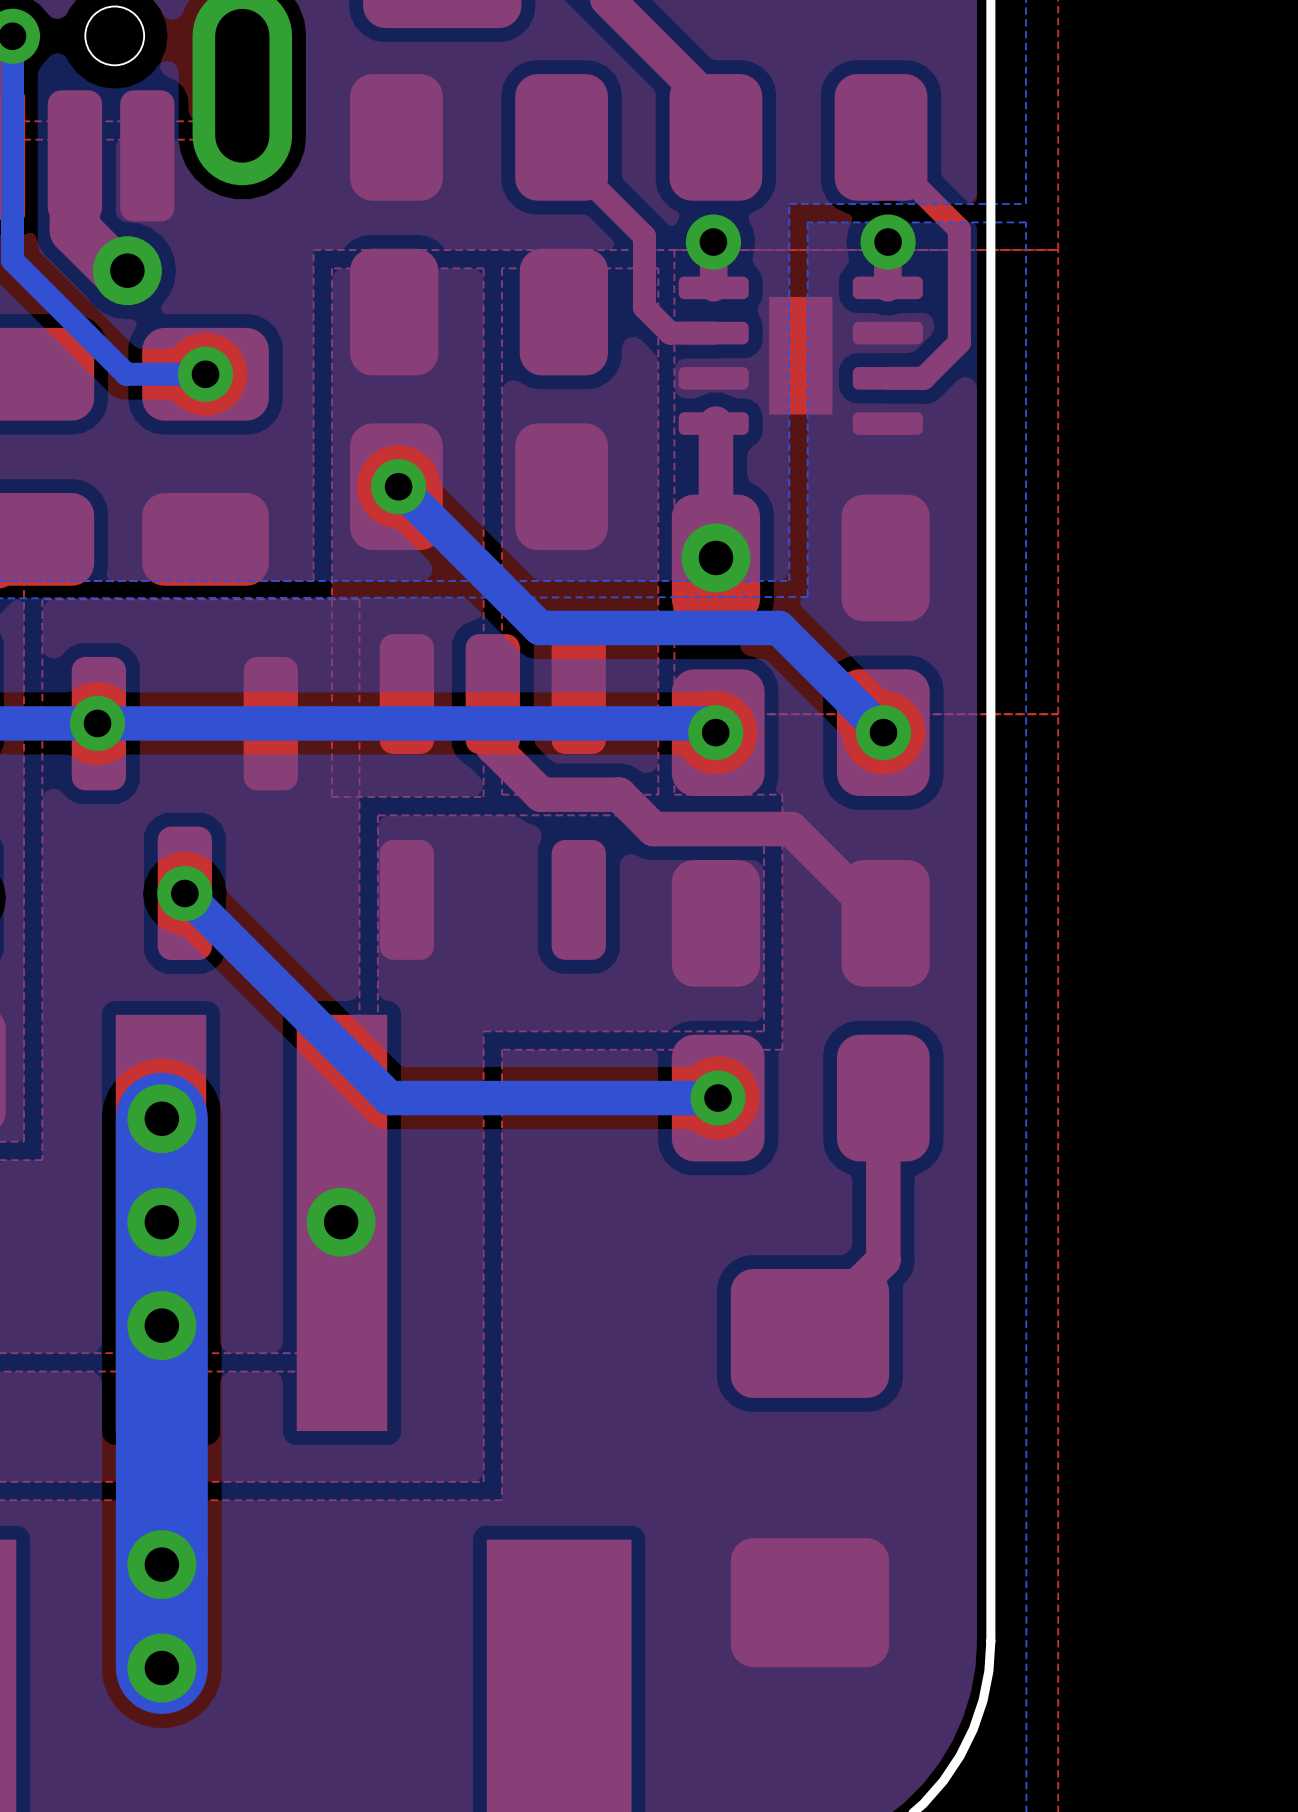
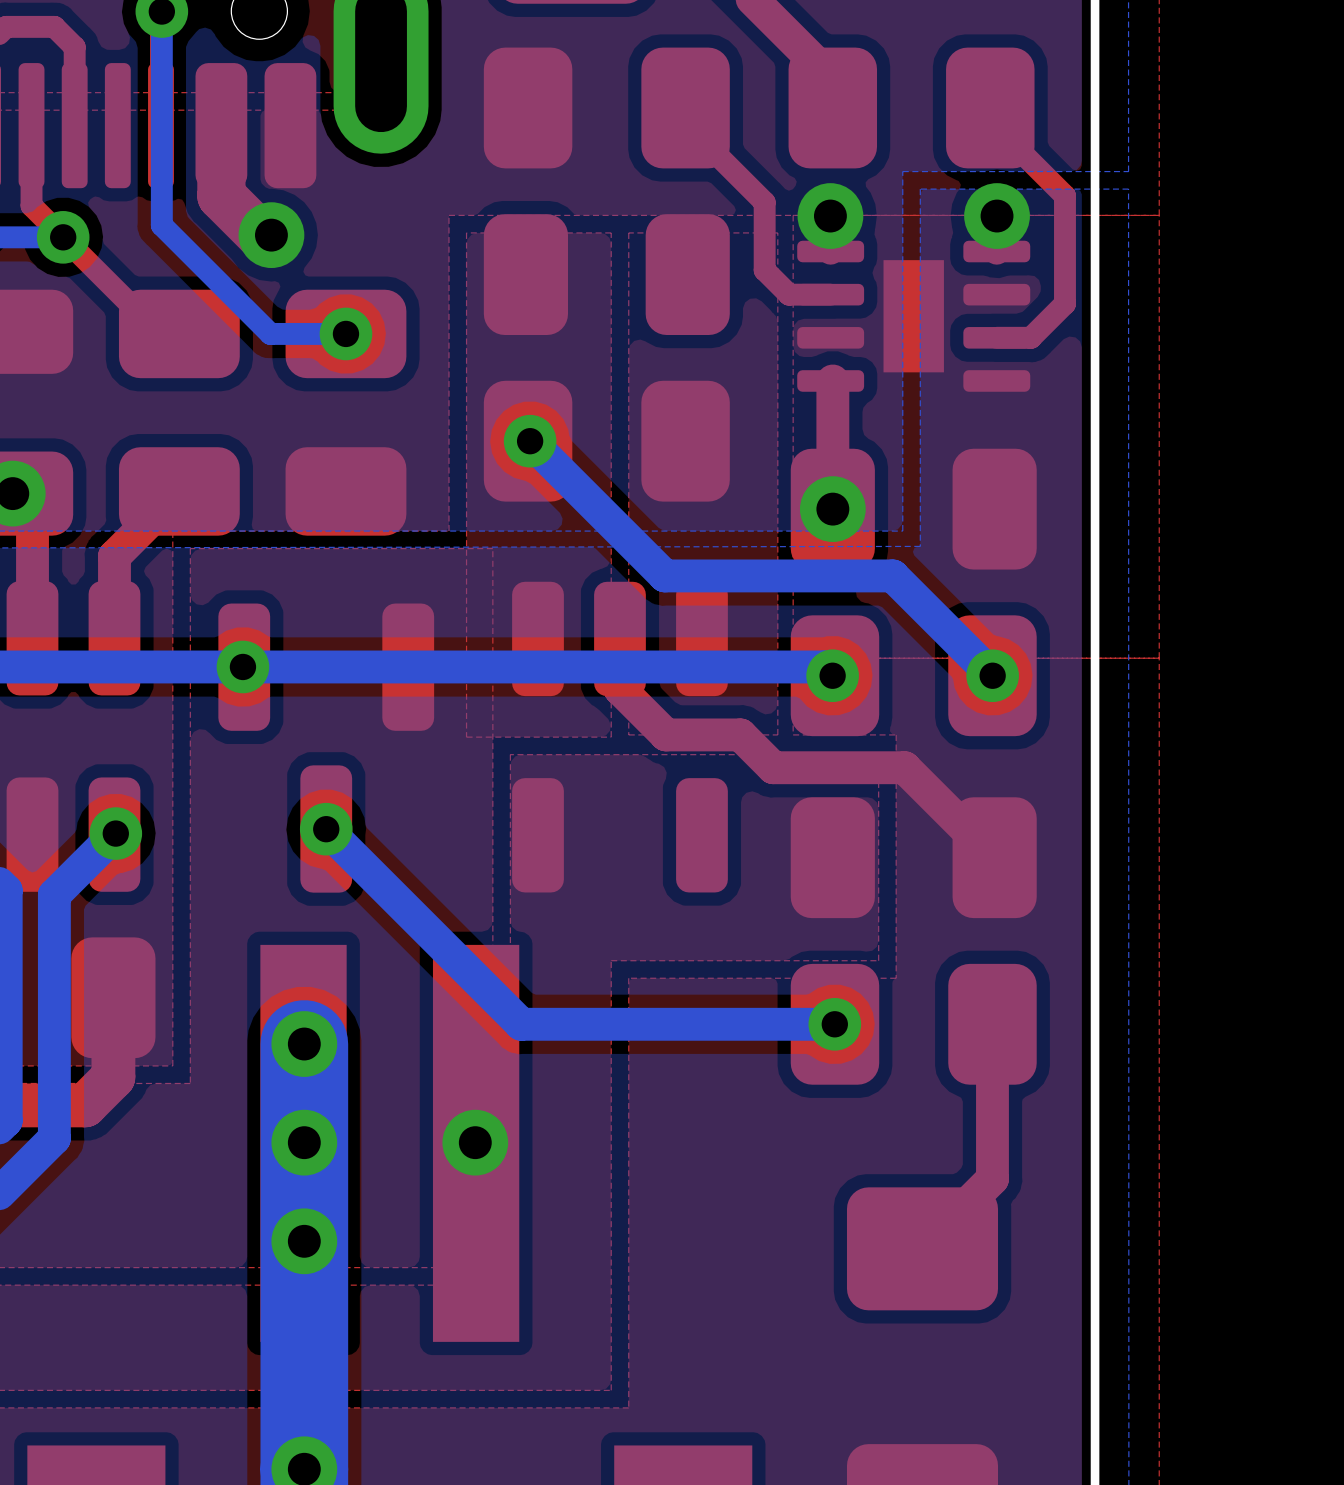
via size: [685, 214, 742, 270] -> [797, 183, 864, 249]
via size: [860, 214, 916, 270] -> [964, 183, 1030, 249]

